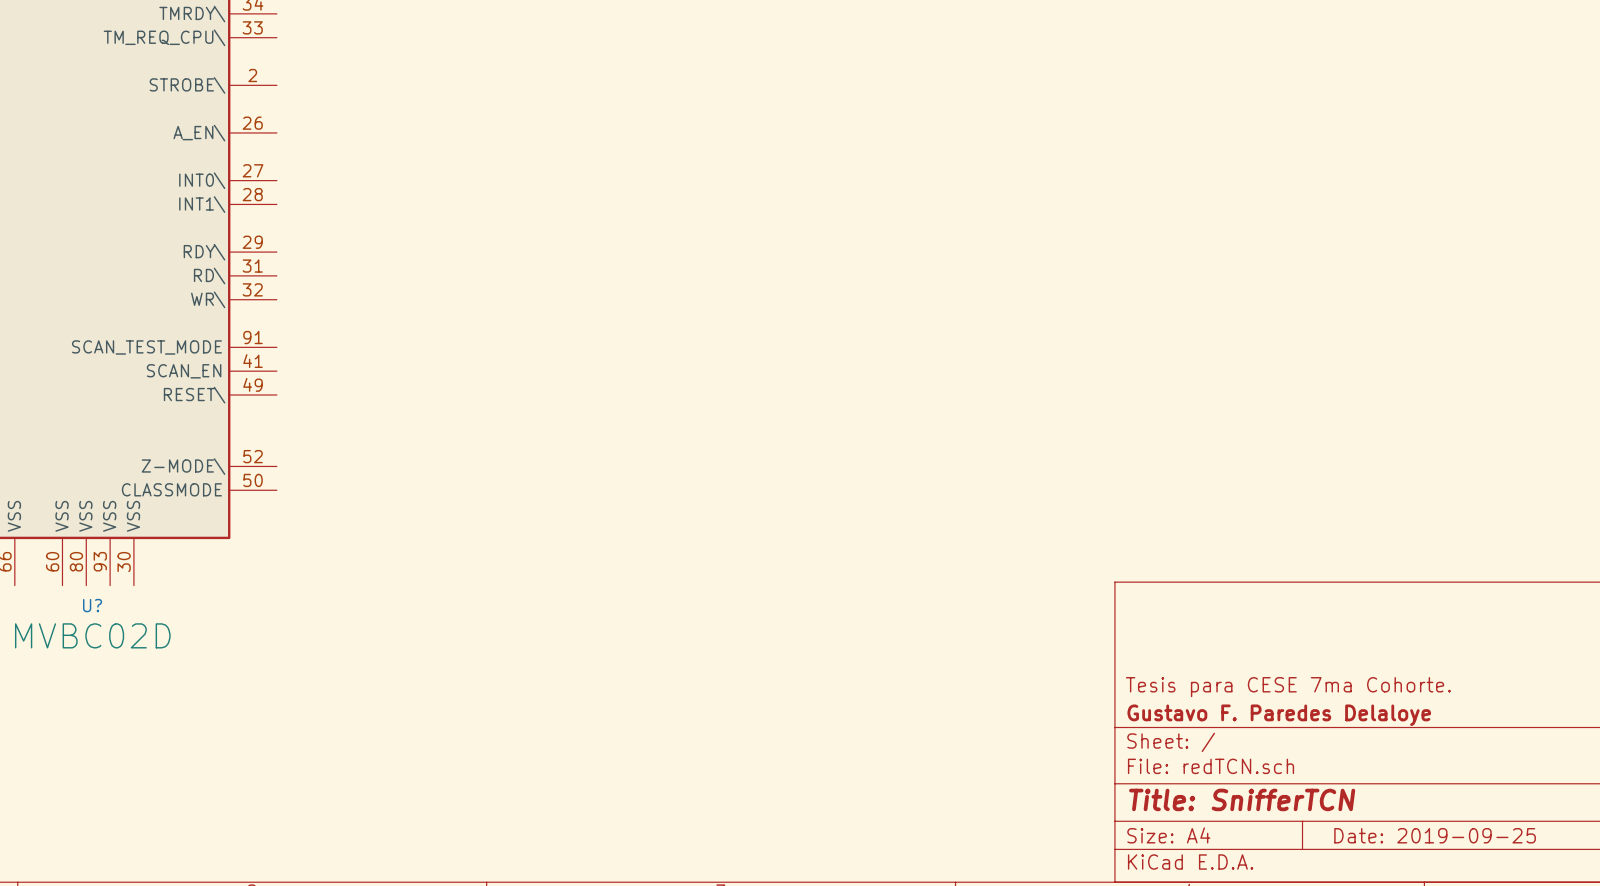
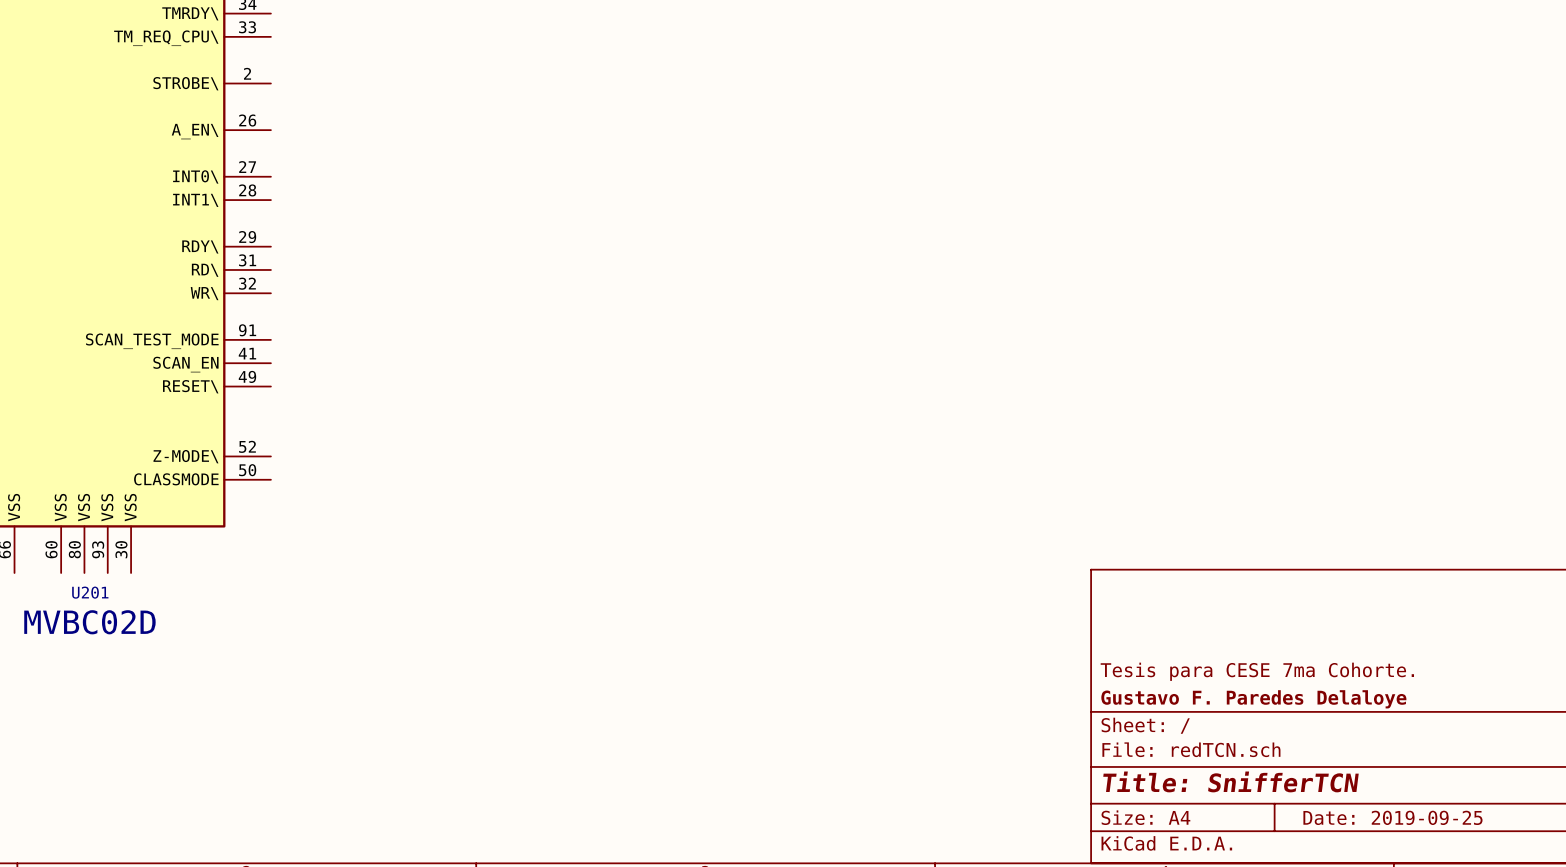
U? name: U? (92, 605) -> U201 (90, 592)

